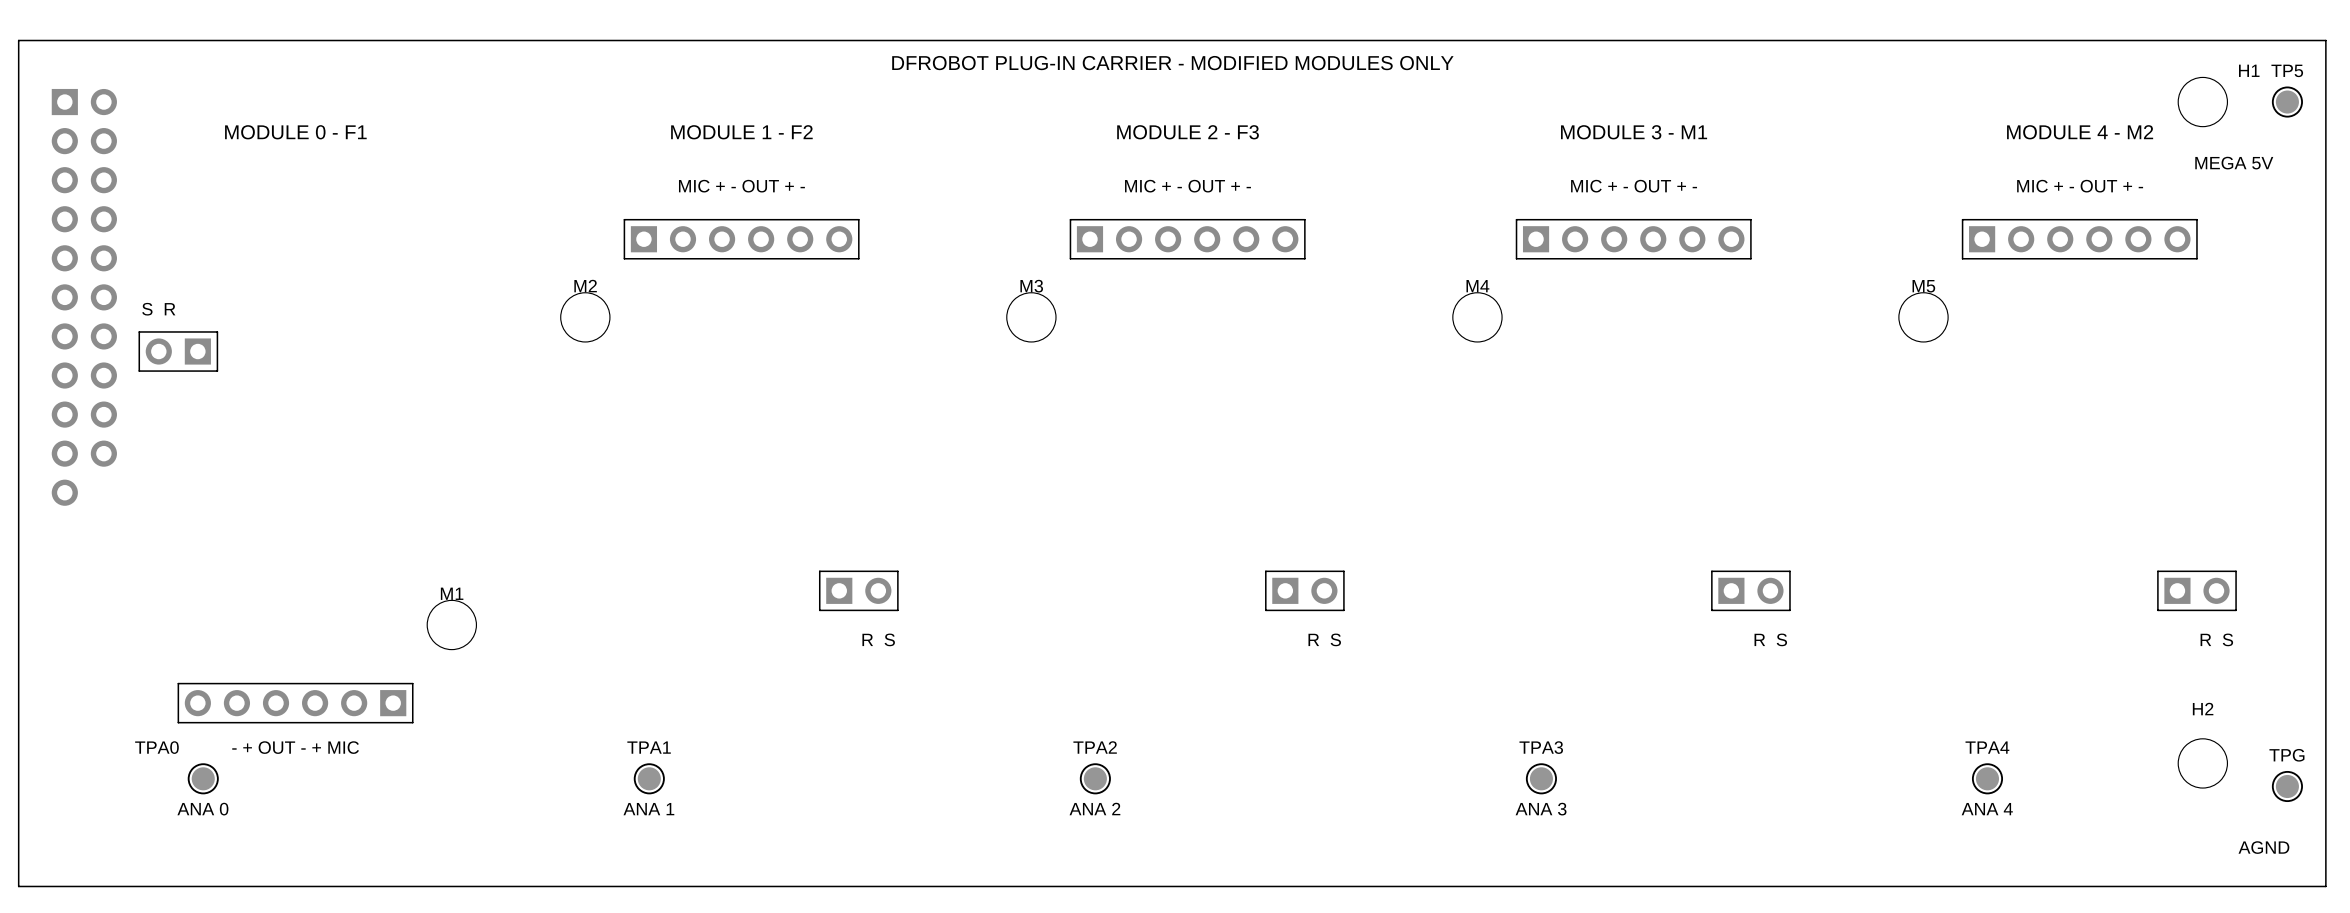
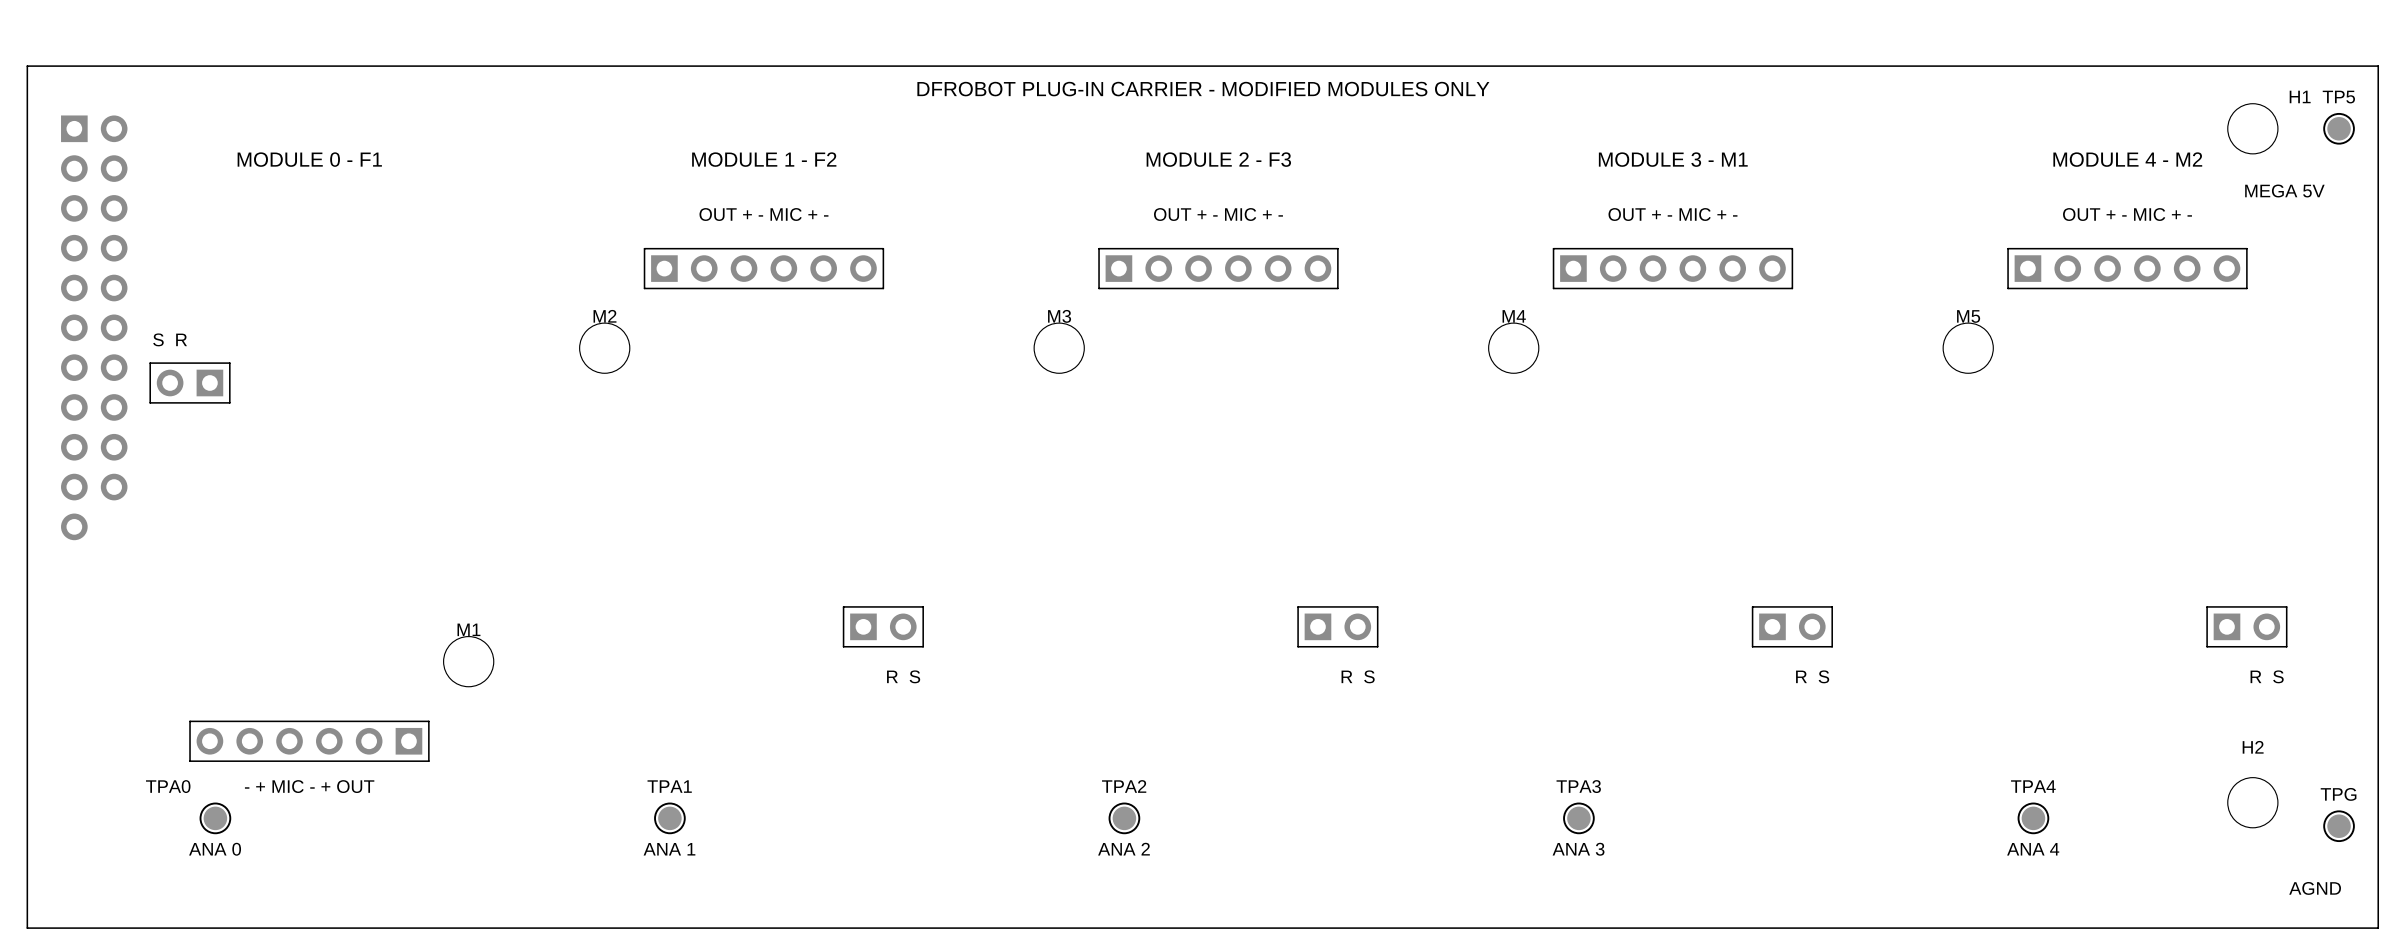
text: MIC + - OUT + - (741, 186) -> OUT + - MIC + - (763, 214)
text: MIC + - OUT + - (1188, 186) -> OUT + - MIC + - (1218, 214)
text: MIC + - OUT + - (1634, 186) -> OUT + - MIC + - (1672, 214)
text: MIC + - OUT + - (2080, 186) -> OUT + - MIC + - (2127, 214)
text: - + OUT - + MIC (295, 747) -> - + MIC - + OUT (309, 786)

